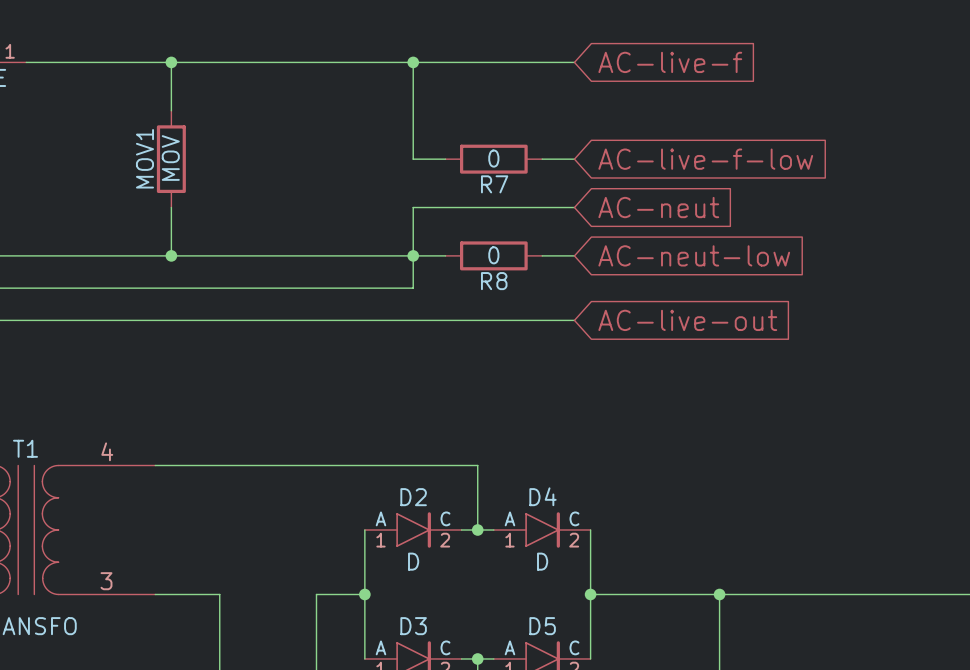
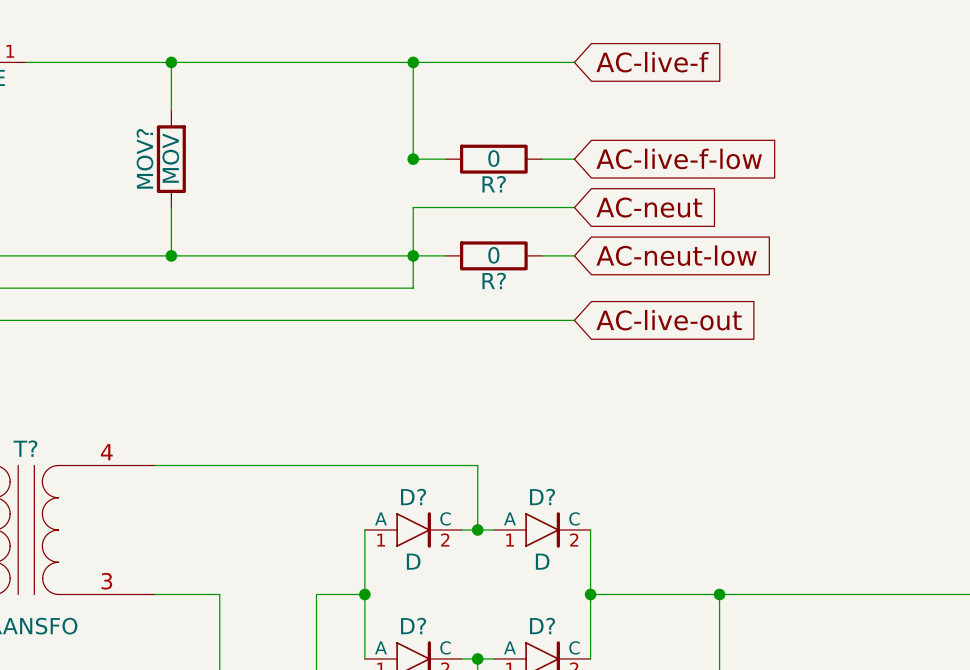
MOV1 name: MOV1 (144, 158) -> MOV? (144, 158)
junction: none -> (413, 159)
R7 name: R7 (494, 184) -> R? (494, 184)
R8 name: R8 (494, 281) -> R? (494, 280)
T1 name: T1 (25, 448) -> T? (25, 448)
D4 name: D4 (542, 496) -> D? (542, 497)
D2 name: D2 (413, 497) -> D? (413, 497)
D3 name: D3 (413, 626) -> D? (413, 625)
D5 name: D5 (542, 626) -> D? (542, 625)

